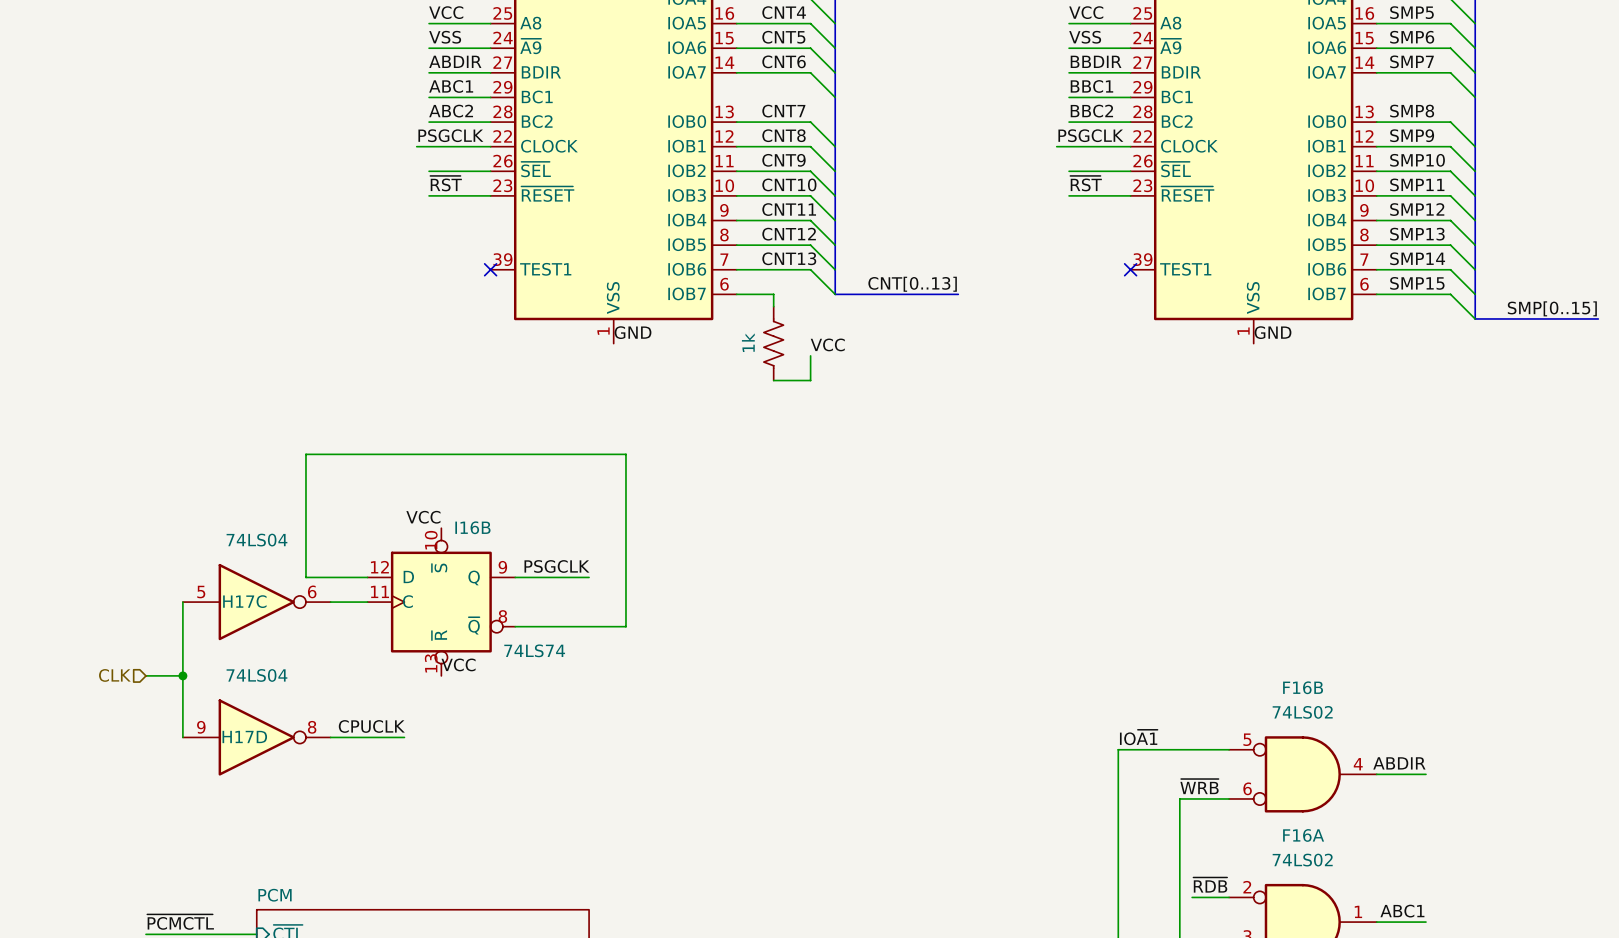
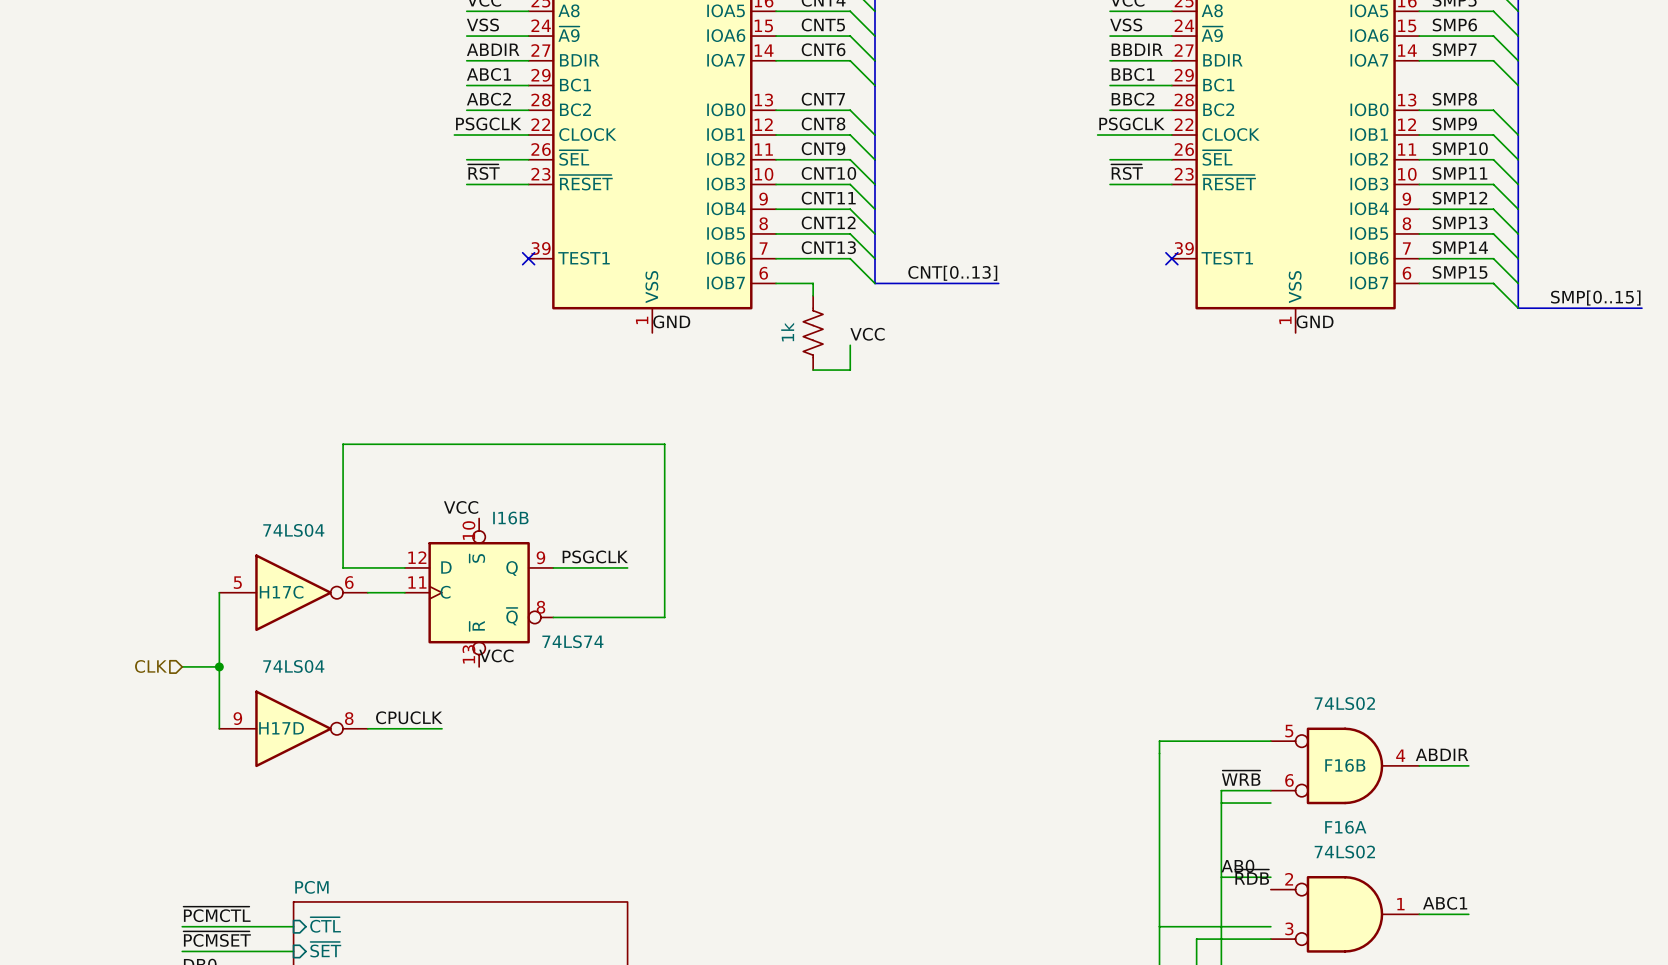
F16B name position: F16B (1303, 687) -> F16B (1345, 765)
label: IO~{A1} (1138, 737) -> none
wire: none -> (1221, 803) (1270, 803)
label: none -> AB0 (1237, 866)
wire: none -> (1221, 877) (1270, 877)
wire: (1192, 897) (1229, 897) -> none
wire: none -> (1159, 926) (1270, 926)

